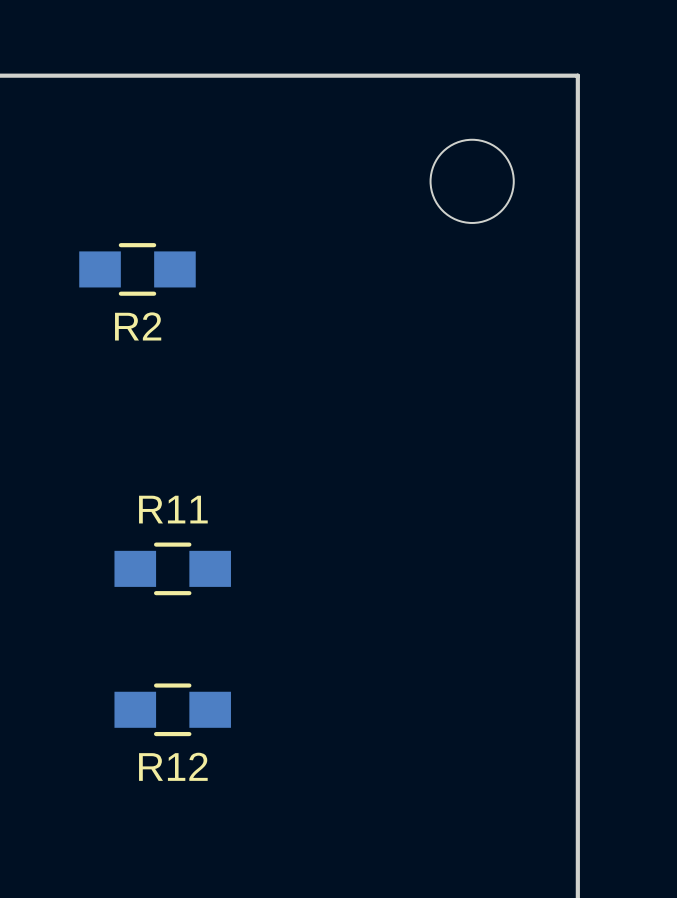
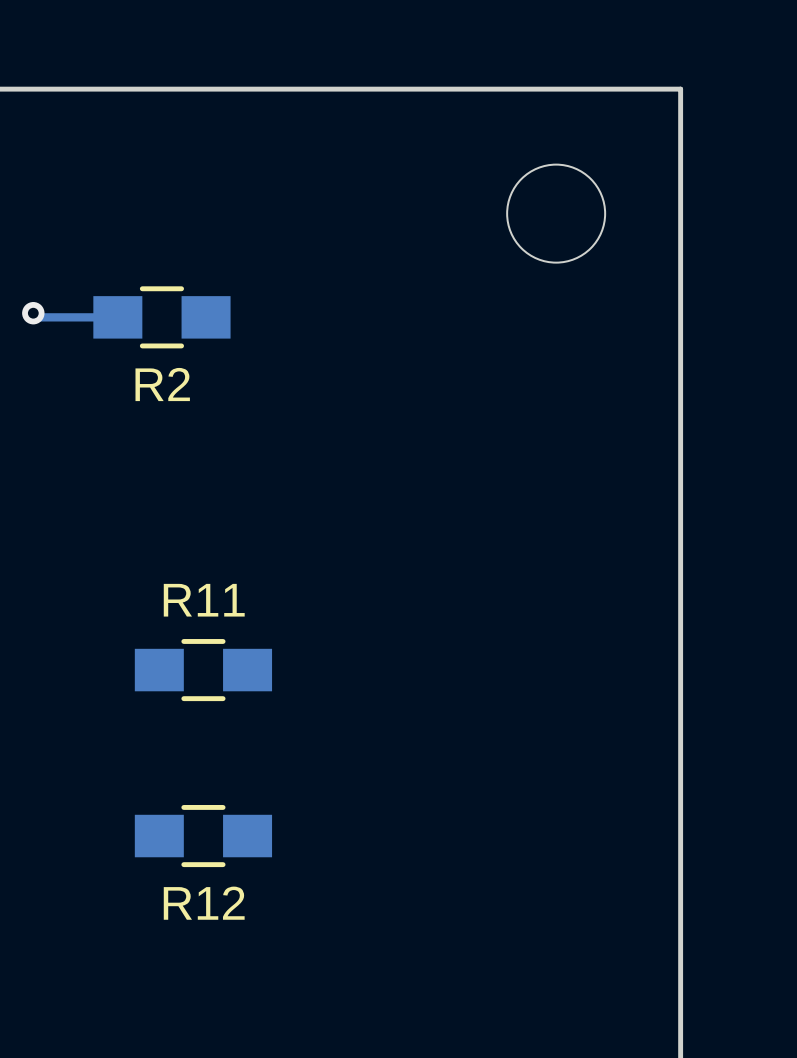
track: none -> (33, 313) (37, 317) (117, 317)
via: none -> (33, 313)

